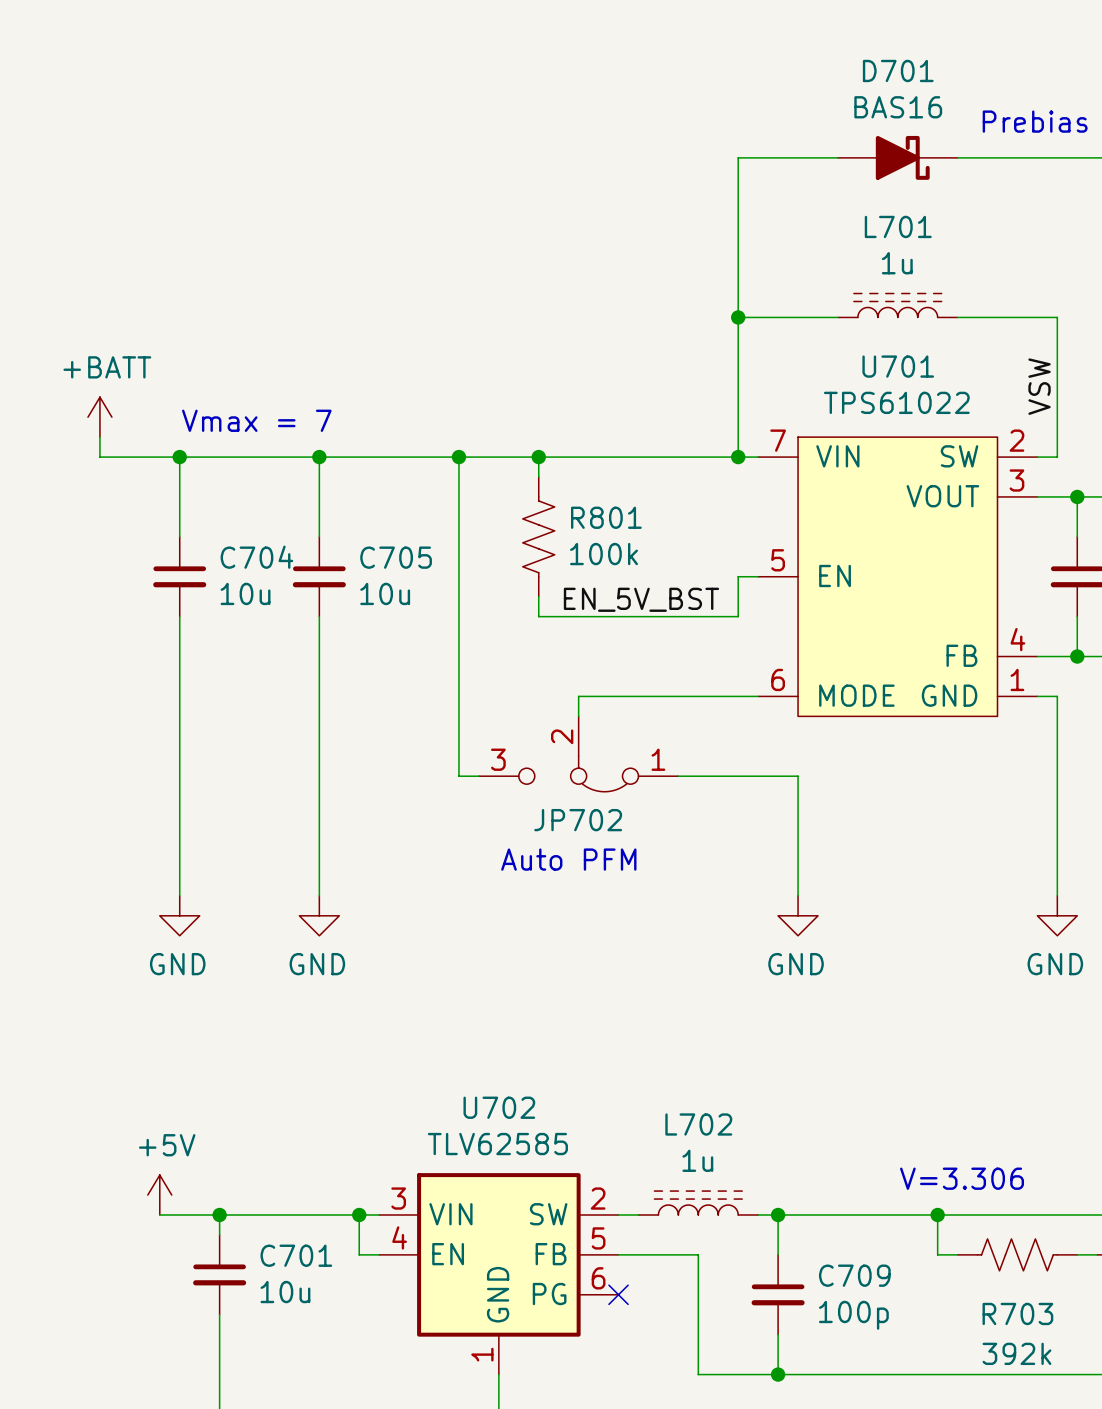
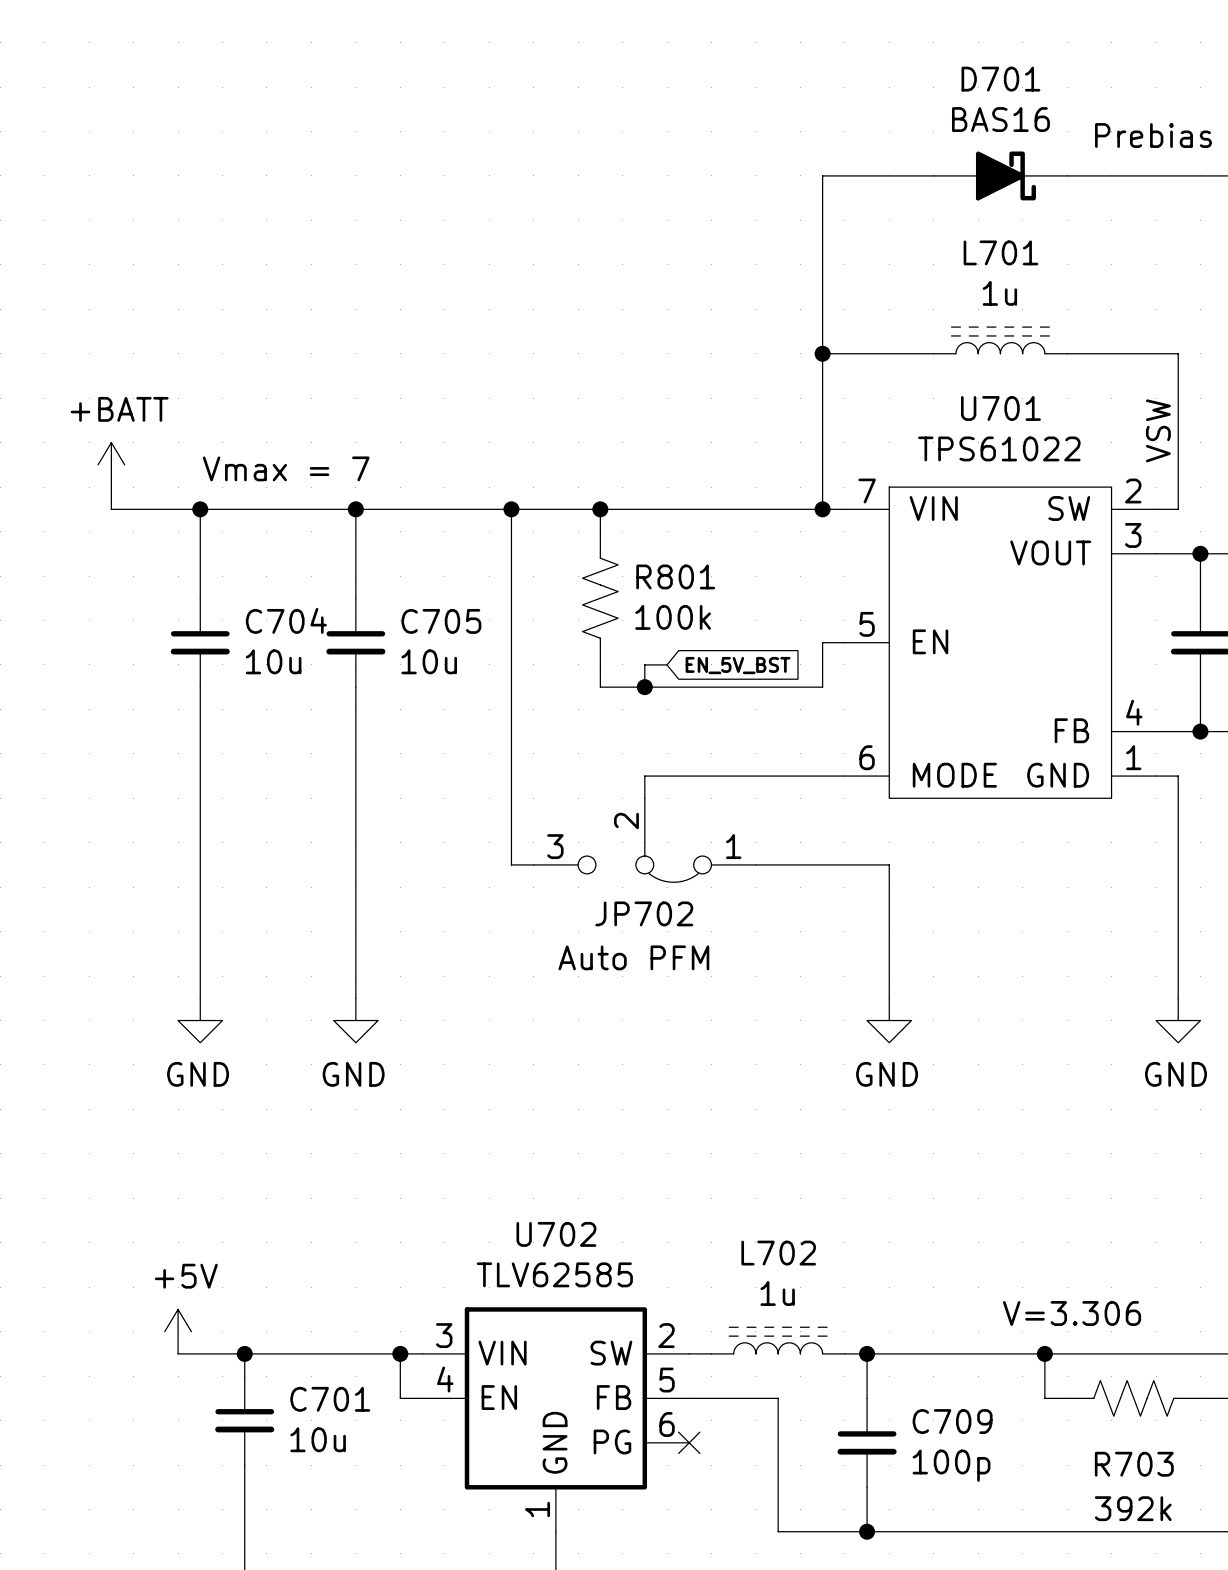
wire: none -> (667, 664) (644, 664) (644, 687)
global label: none -> EN_5V_BST (738, 665)
label: EN_5V_BST (641, 599) -> none
junction: none -> (644, 687)

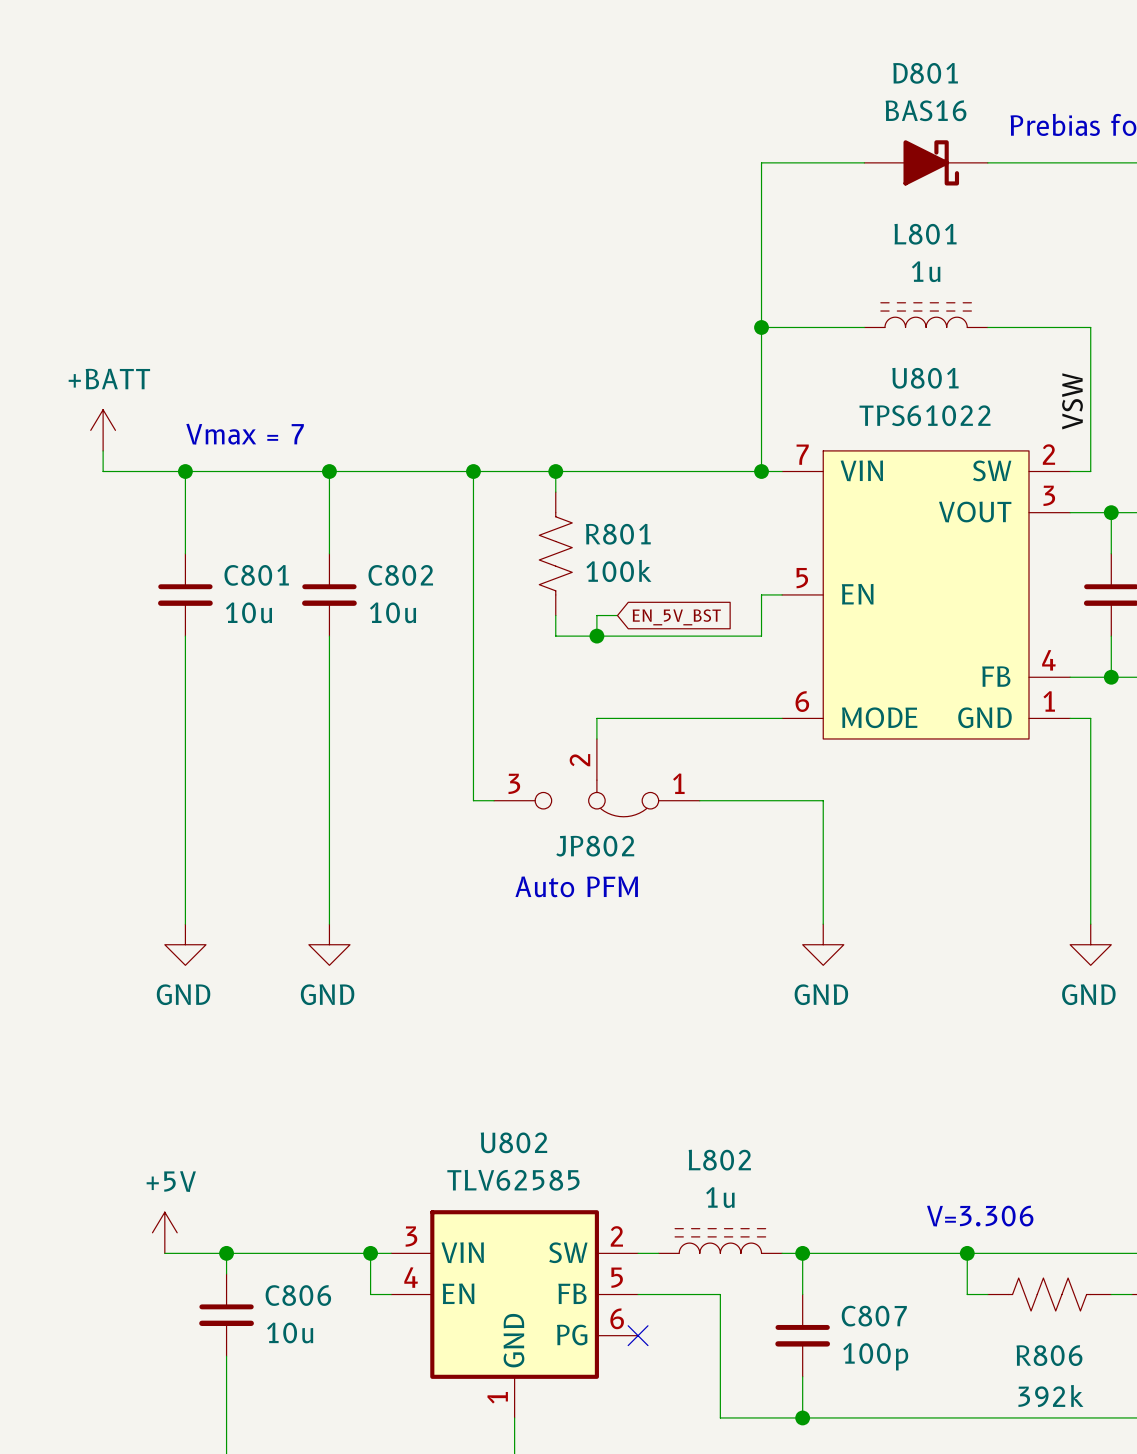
D701 name: D701 (1000, 79) -> D801 (925, 73)
L701 name: L701 (1000, 252) -> L801 (925, 234)
U701 name: U701 (1000, 408) -> U801 (925, 378)
C704 name: C704 (286, 620) -> C801 (256, 575)
C705 name: C705 (441, 621) -> C802 (400, 575)
JP702 name: JP702 (644, 913) -> JP802 (595, 846)
U702 name: U702 (556, 1234) -> U802 (513, 1142)
L702 name: L702 (778, 1253) -> L802 (719, 1160)
C701 name: C701 (330, 1399) -> C806 (298, 1295)
C709 name: C709 (952, 1421) -> C807 (874, 1316)
R703 name: R703 (1134, 1464) -> R806 (1049, 1355)

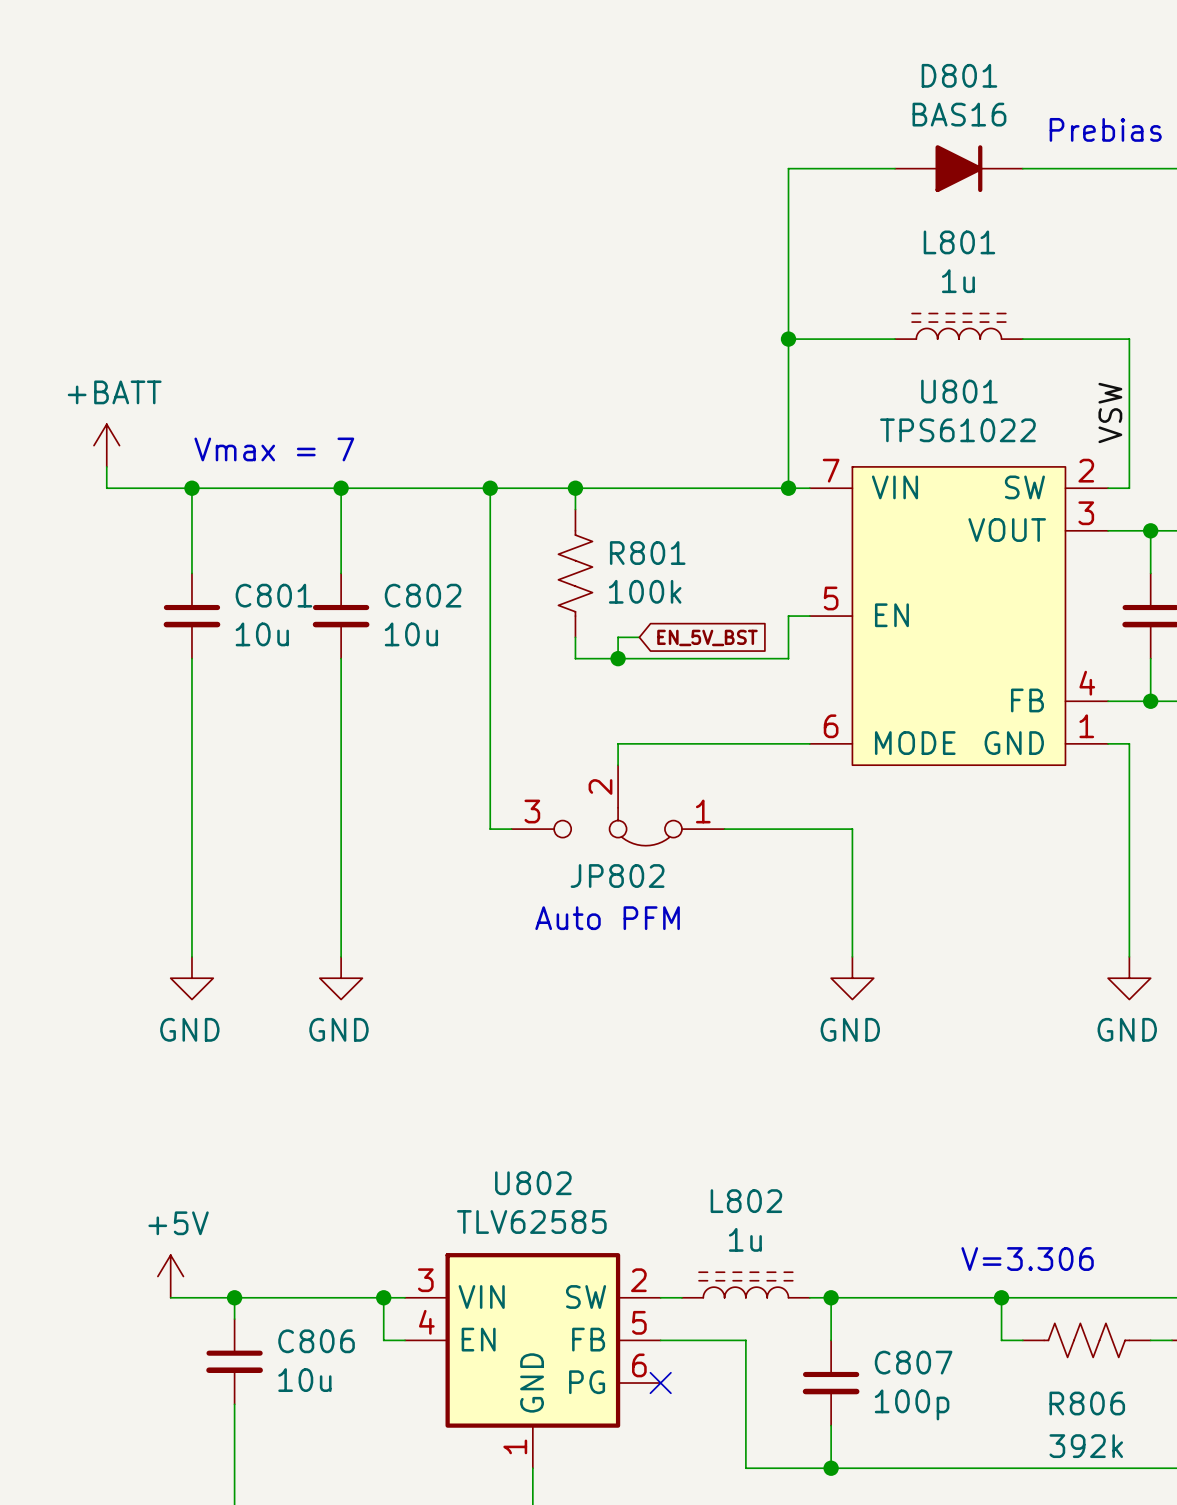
D801 symbol: [864, 140, 988, 186] -> [895, 145, 1023, 193]

